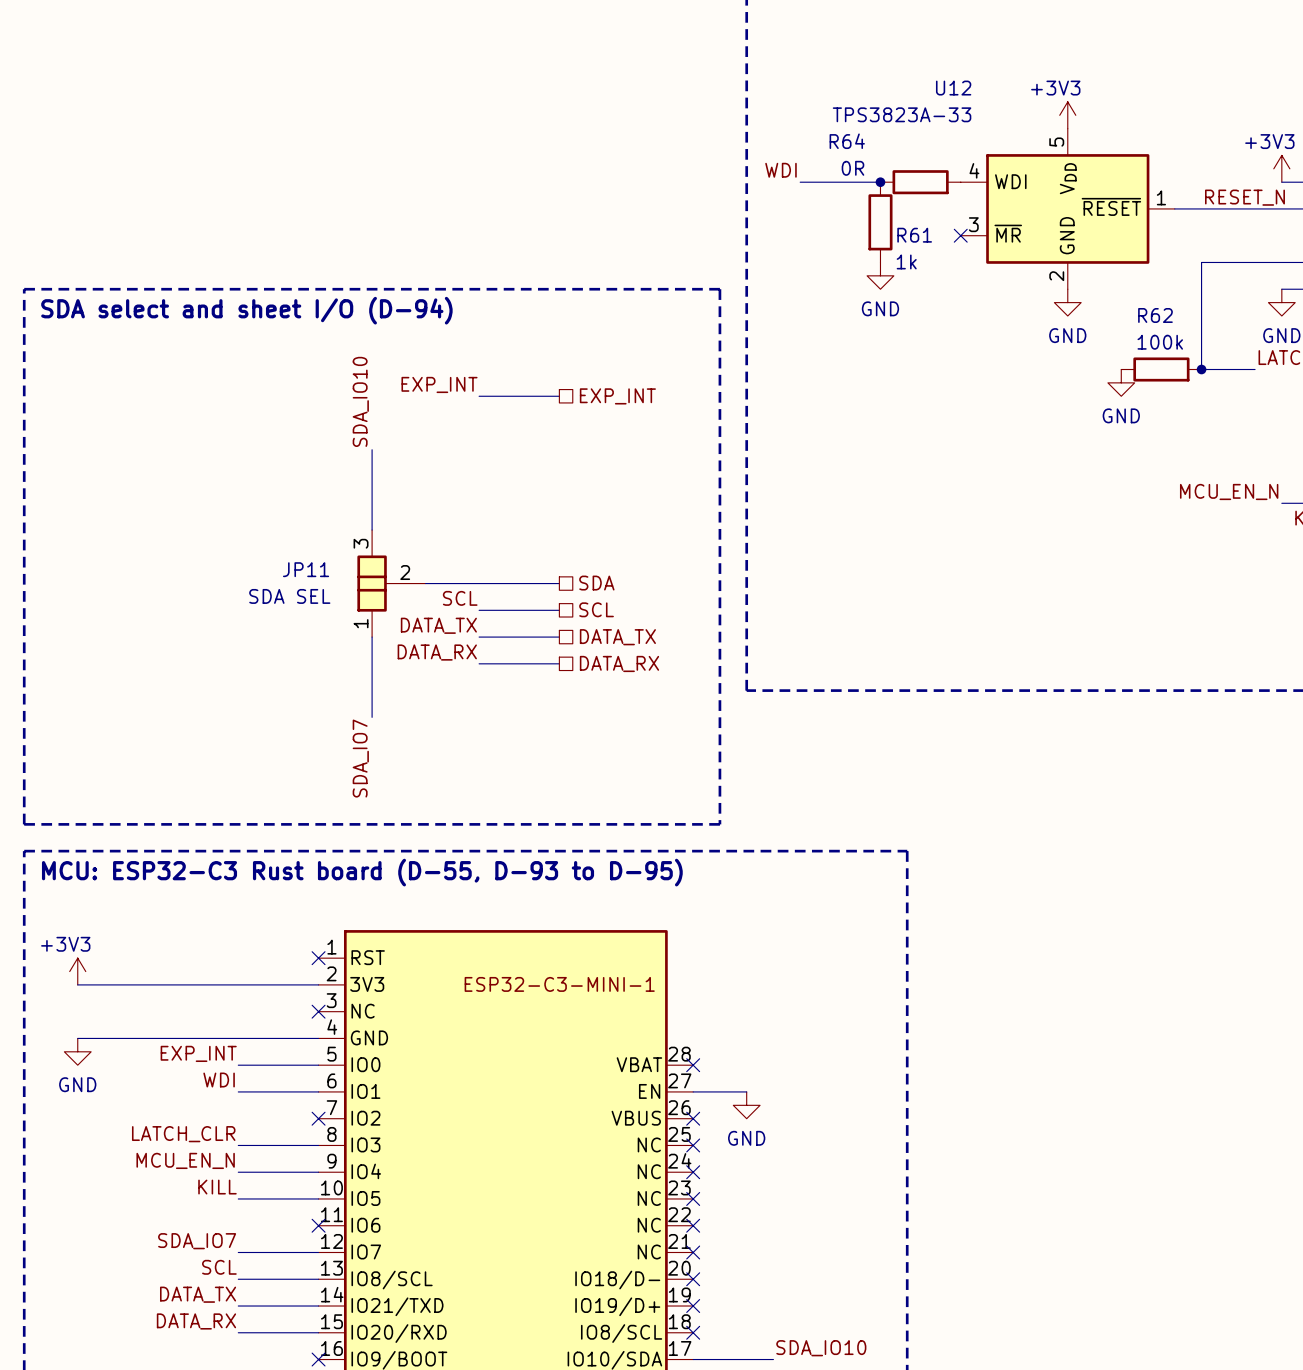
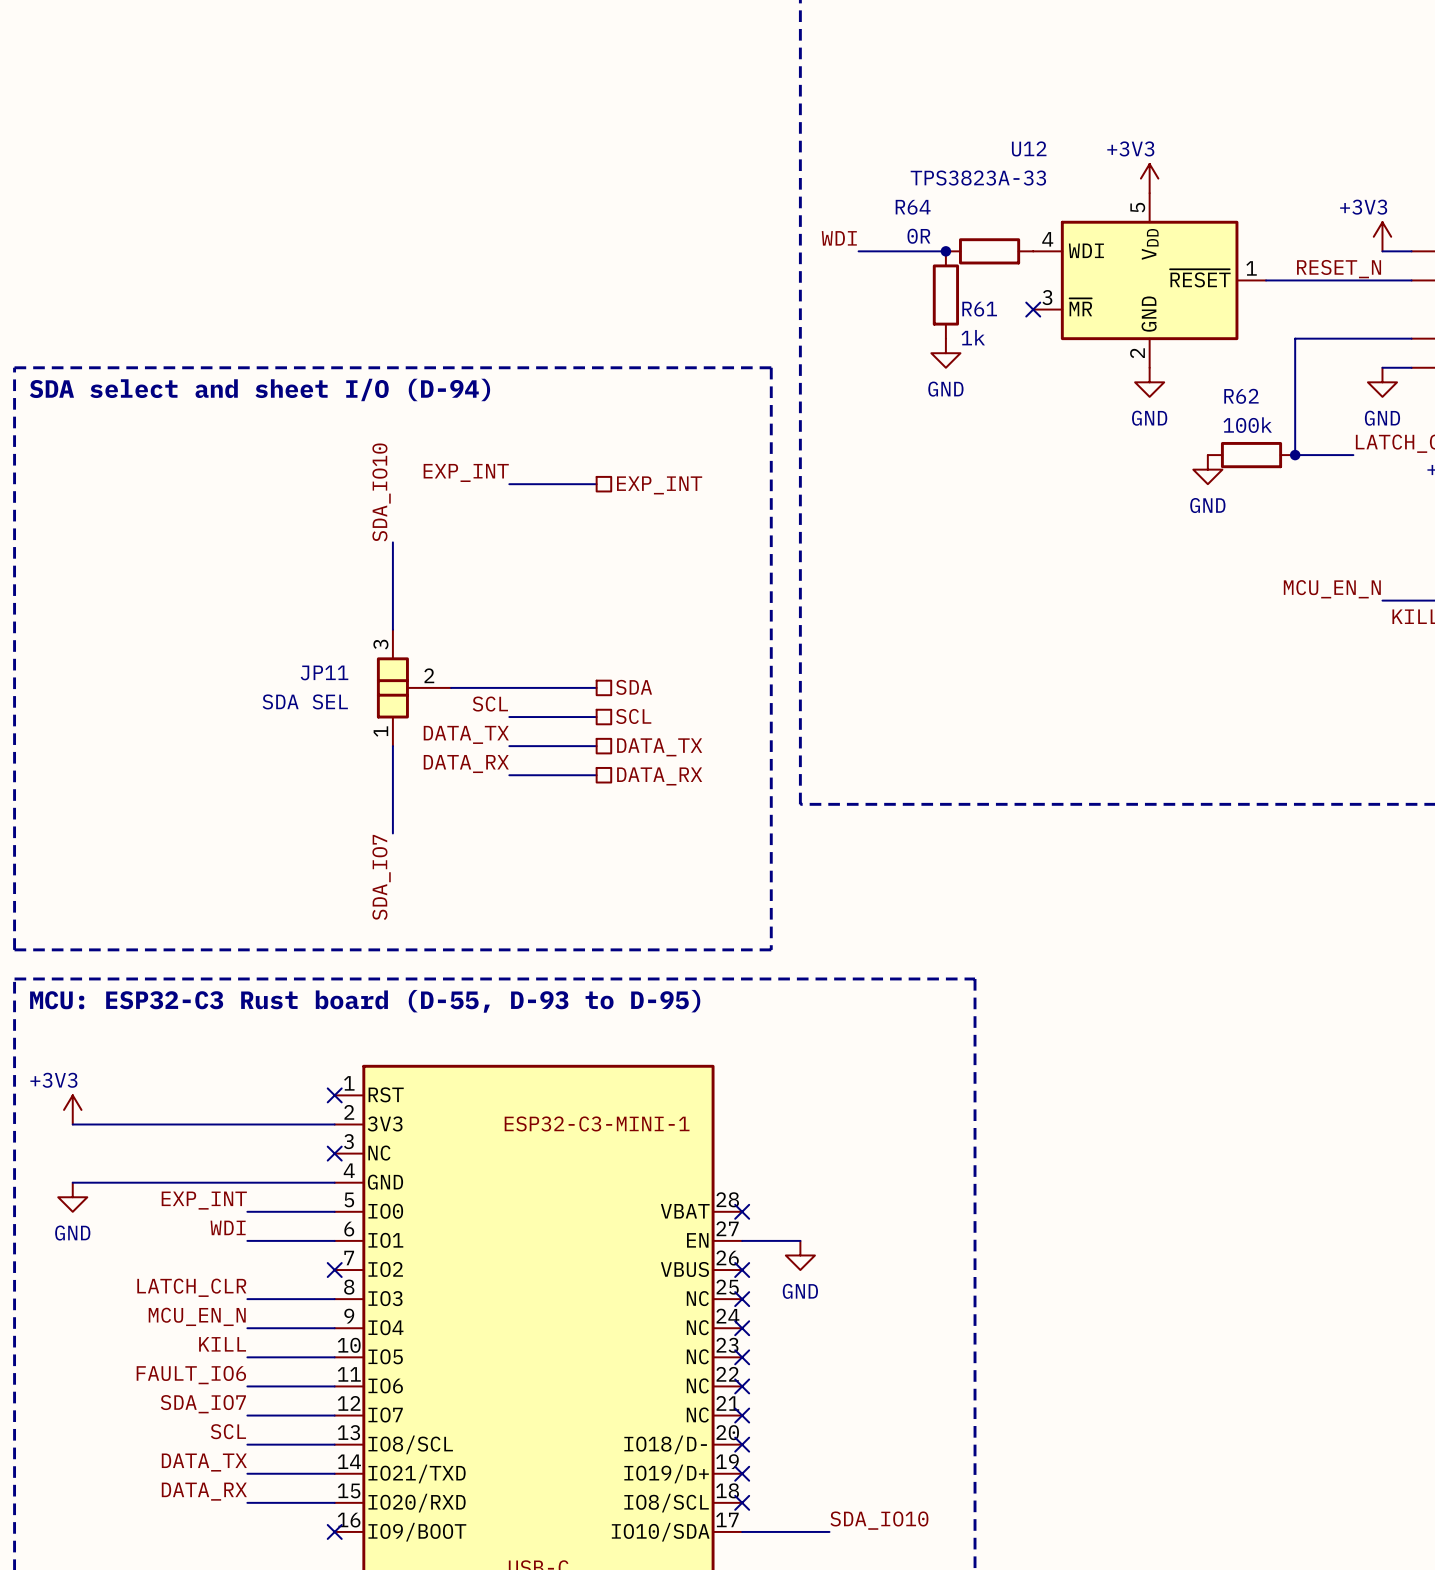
label: none -> FAULT_IO6 (191, 1375)
wire: none -> (247, 1386) (334, 1386)
no-connect mark: (318, 1225) -> none

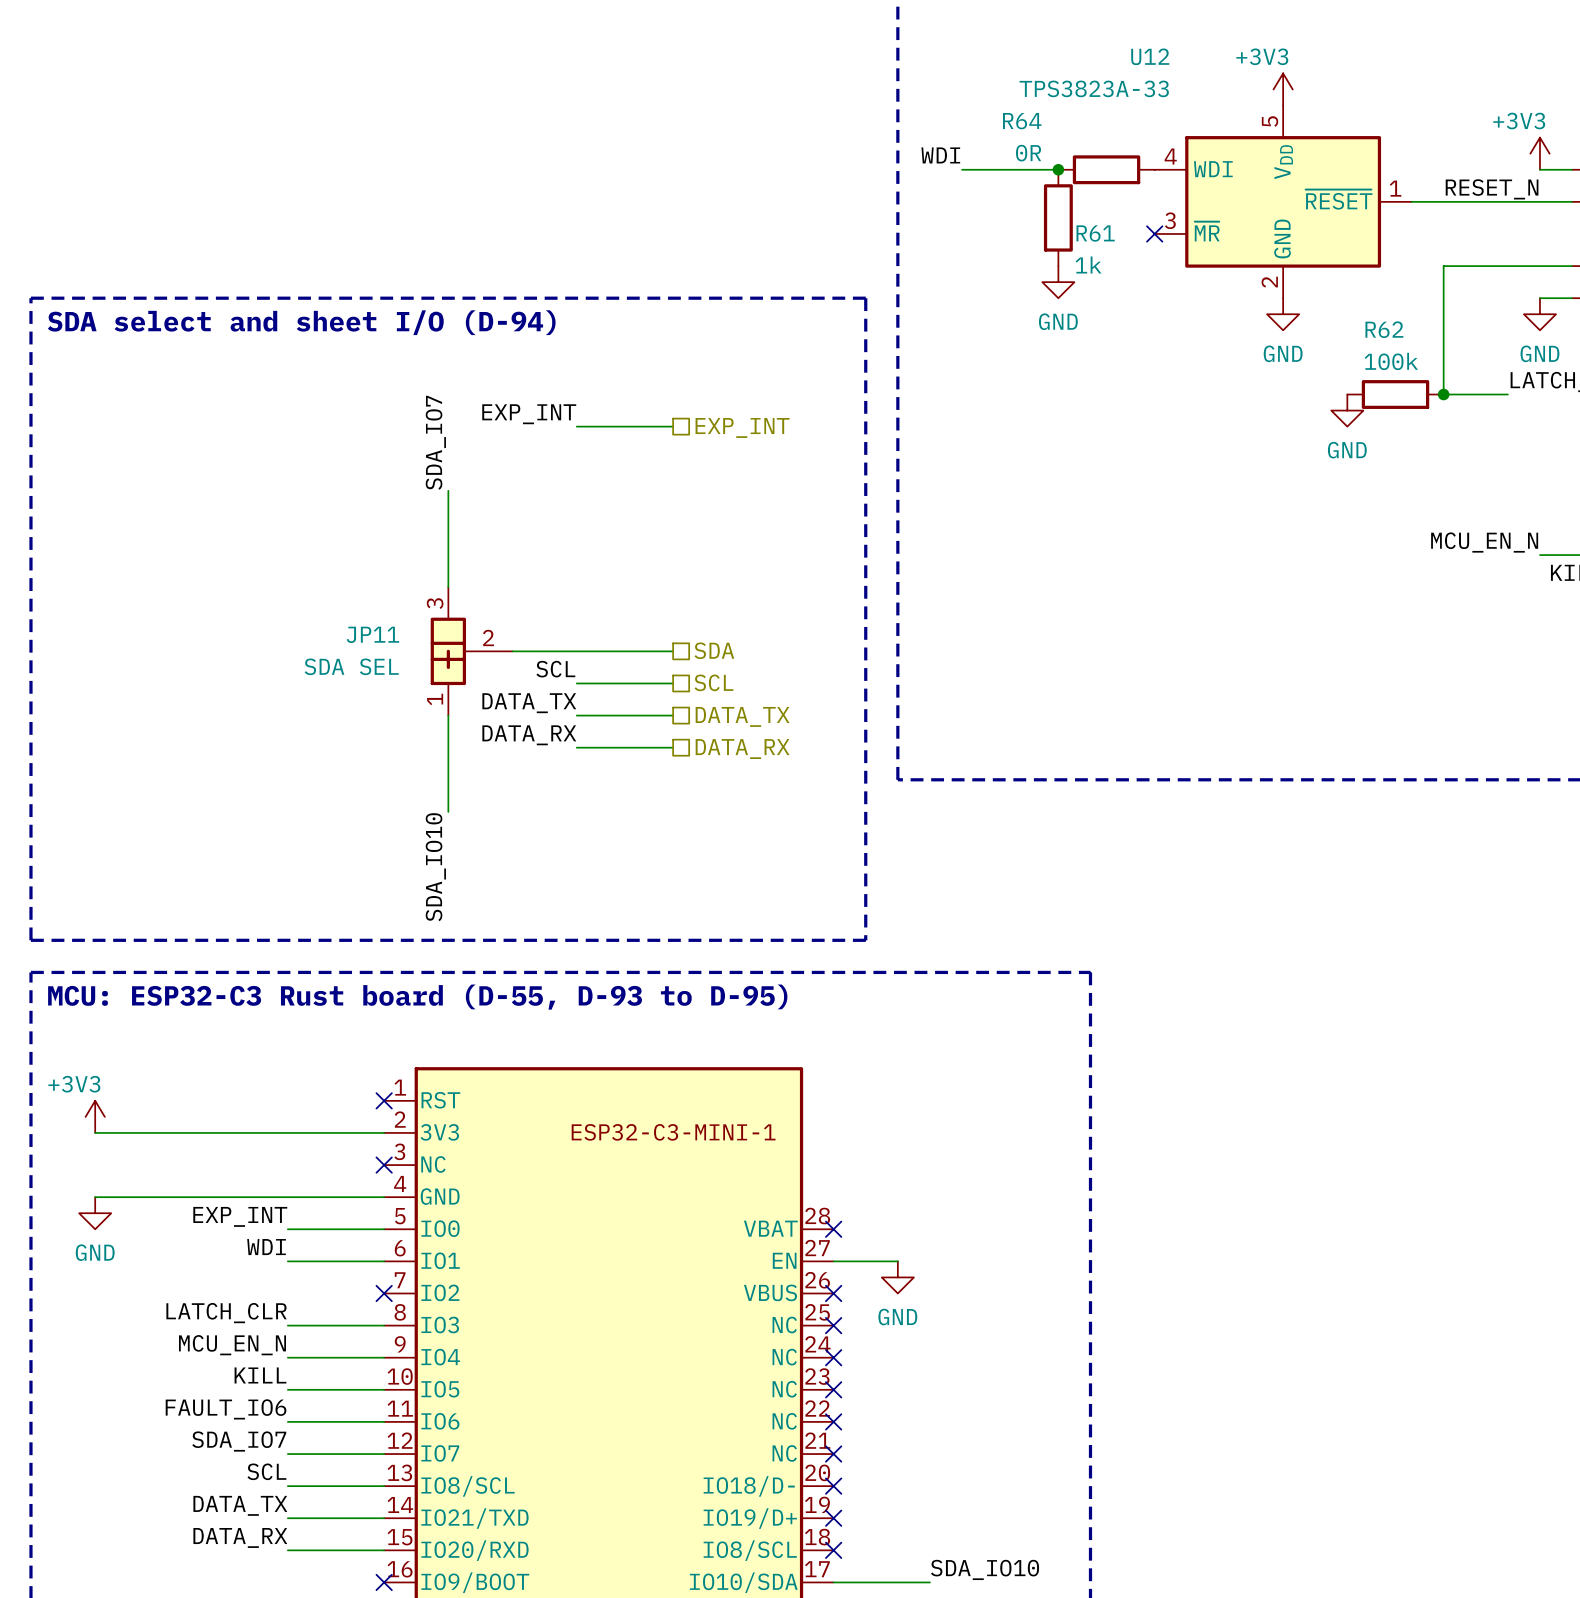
label: SDA_IO10 (381, 492) -> SDA_IO7 (435, 442)
JP11 symbol: [376, 629, 452, 747] -> [430, 587, 513, 716]
label: SDA_IO7 (381, 877) -> SDA_IO10 (435, 867)

